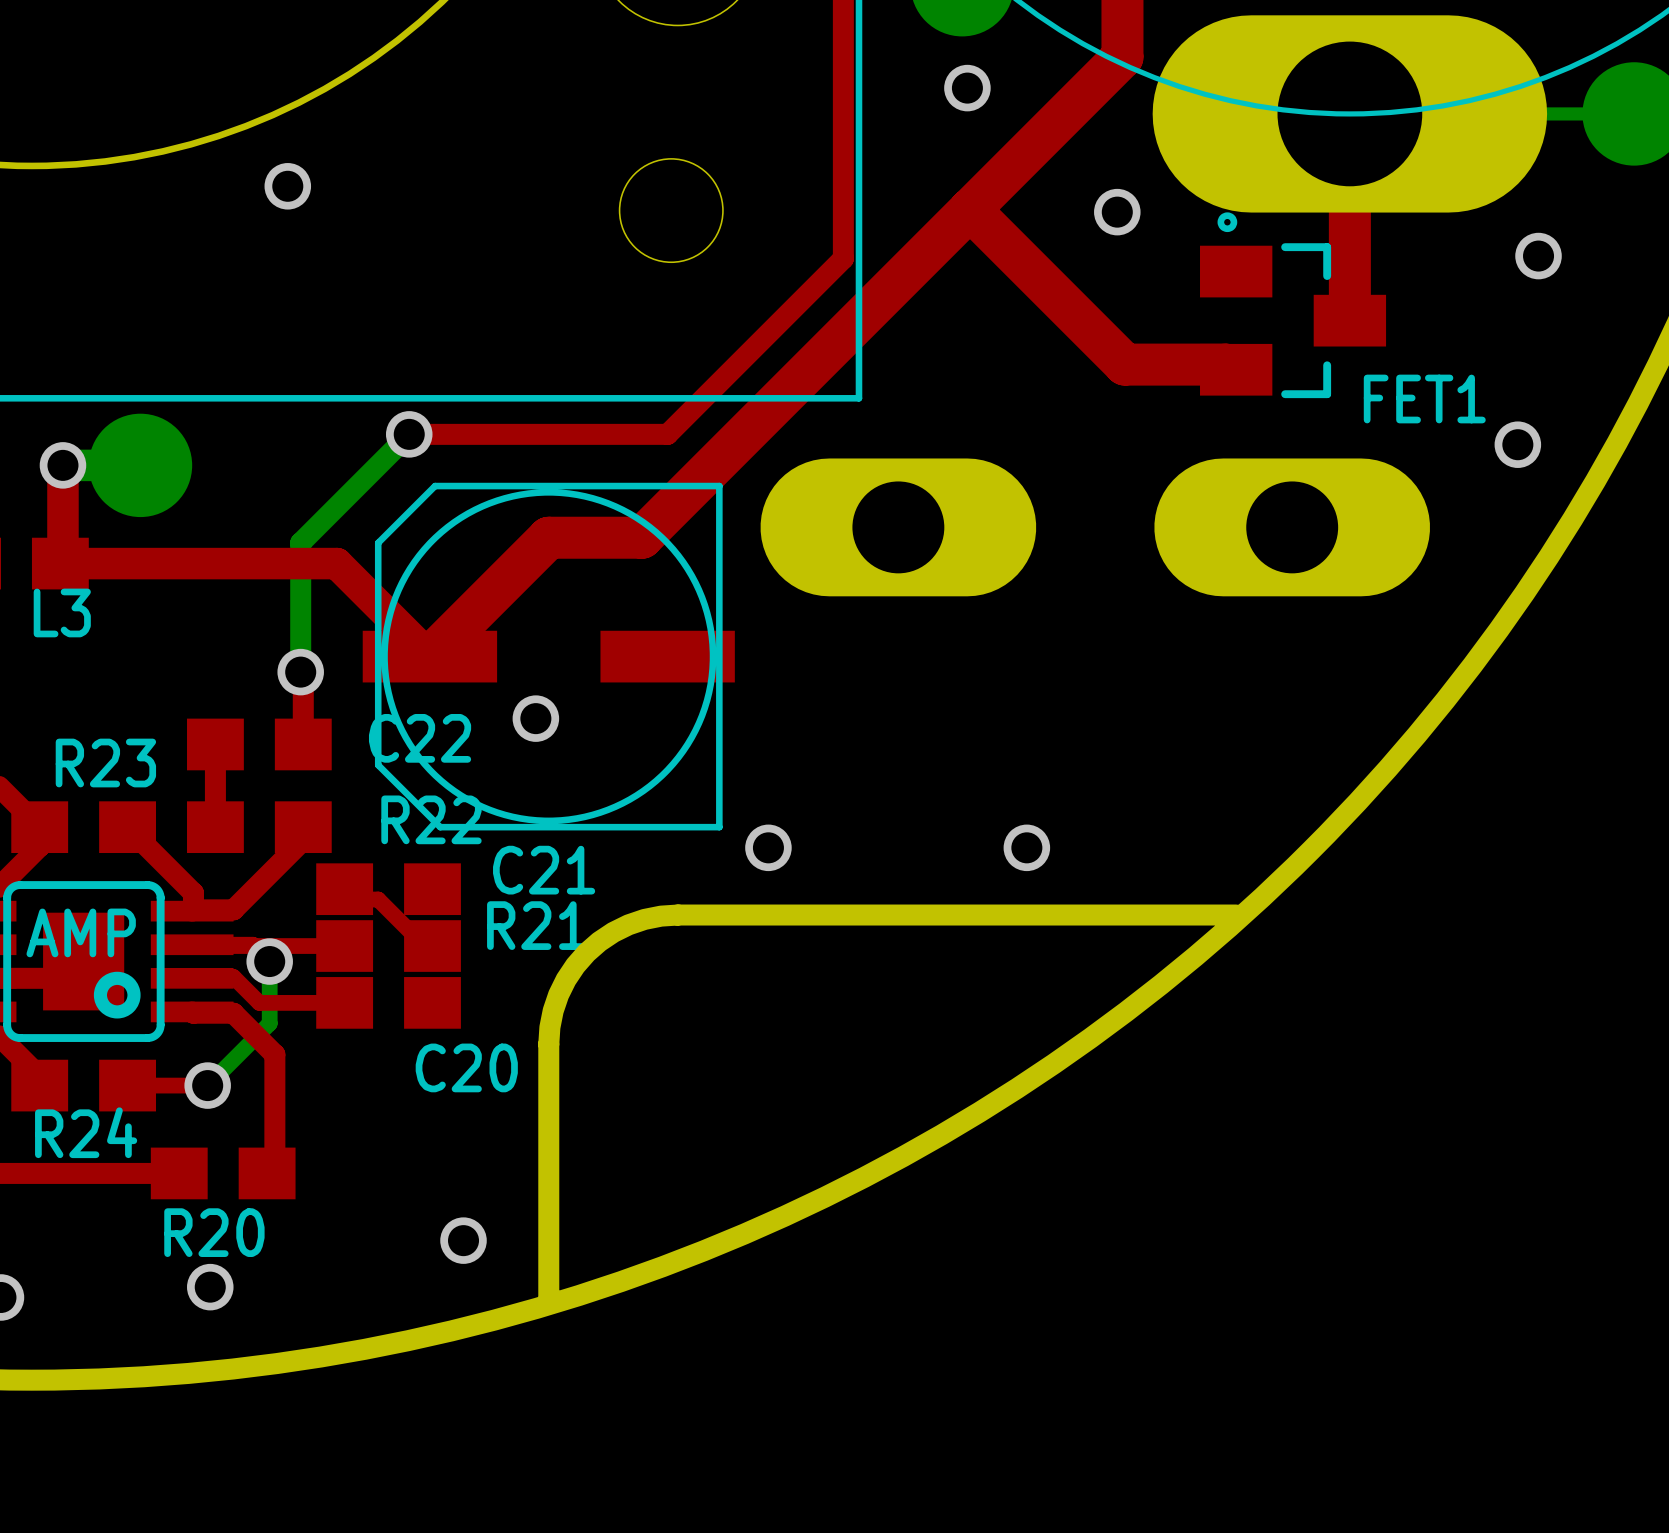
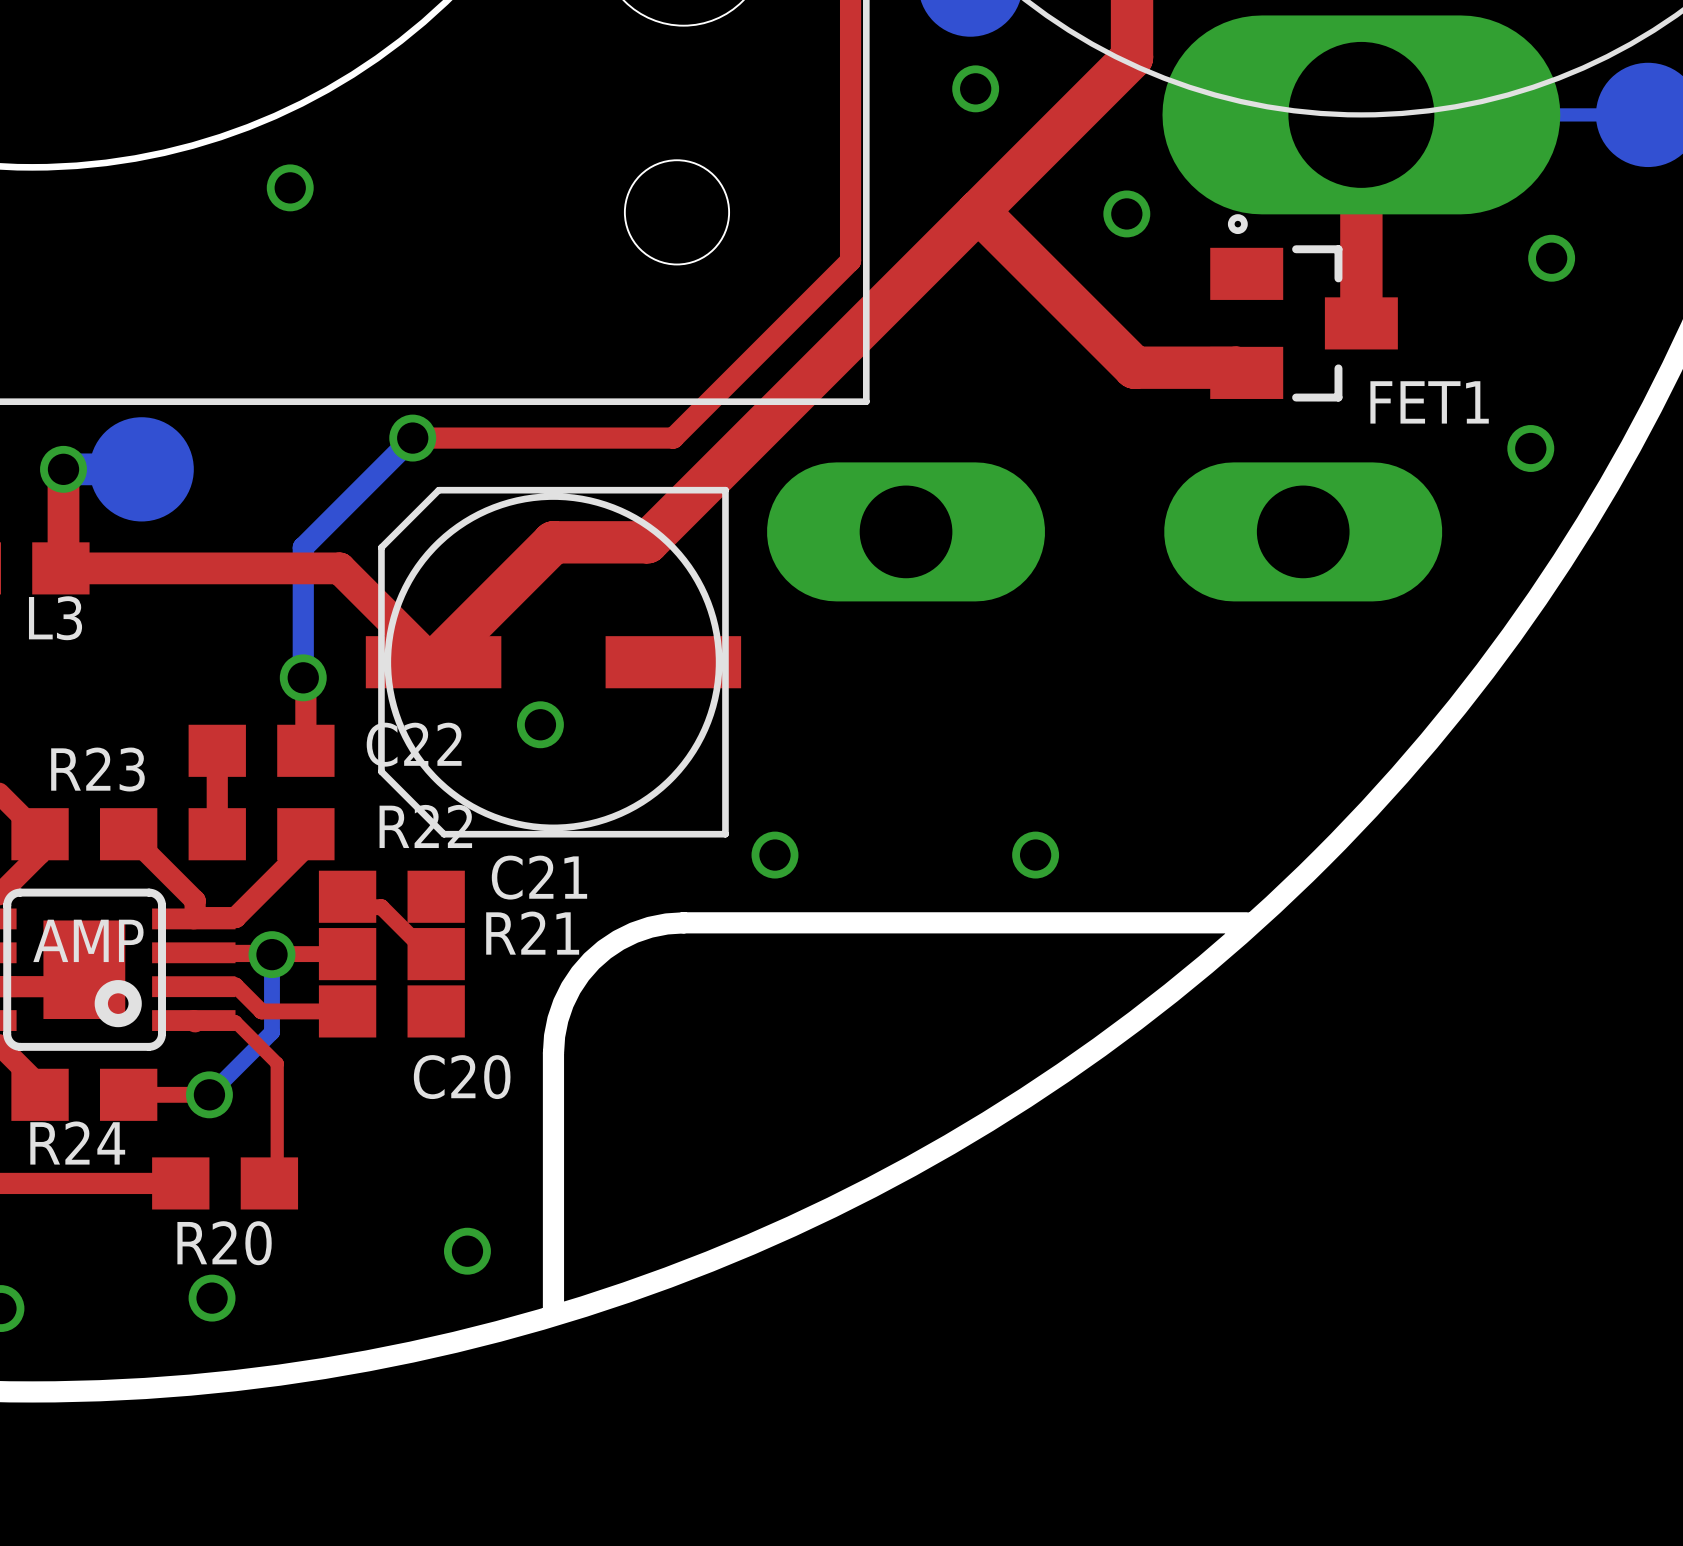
via position: (269, 961) -> (271, 954)
top track width: thick (193, 1013) (233, 1013) (274, 1054) (274, 1165) -> thin (195, 1021) (235, 1021) (277, 1063) (277, 1175)

